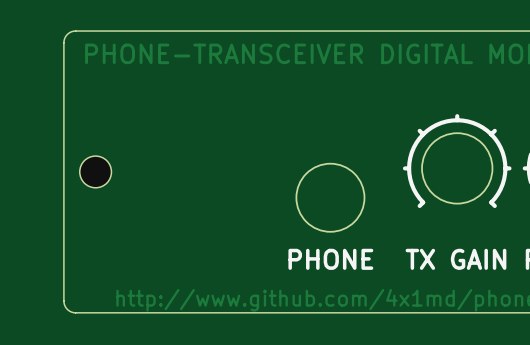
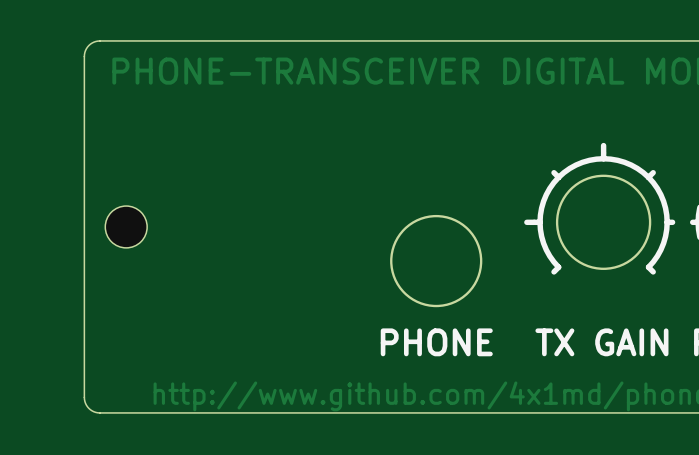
line: none -> (603, 145) (603, 152)
line: none -> (526, 222) (533, 222)

